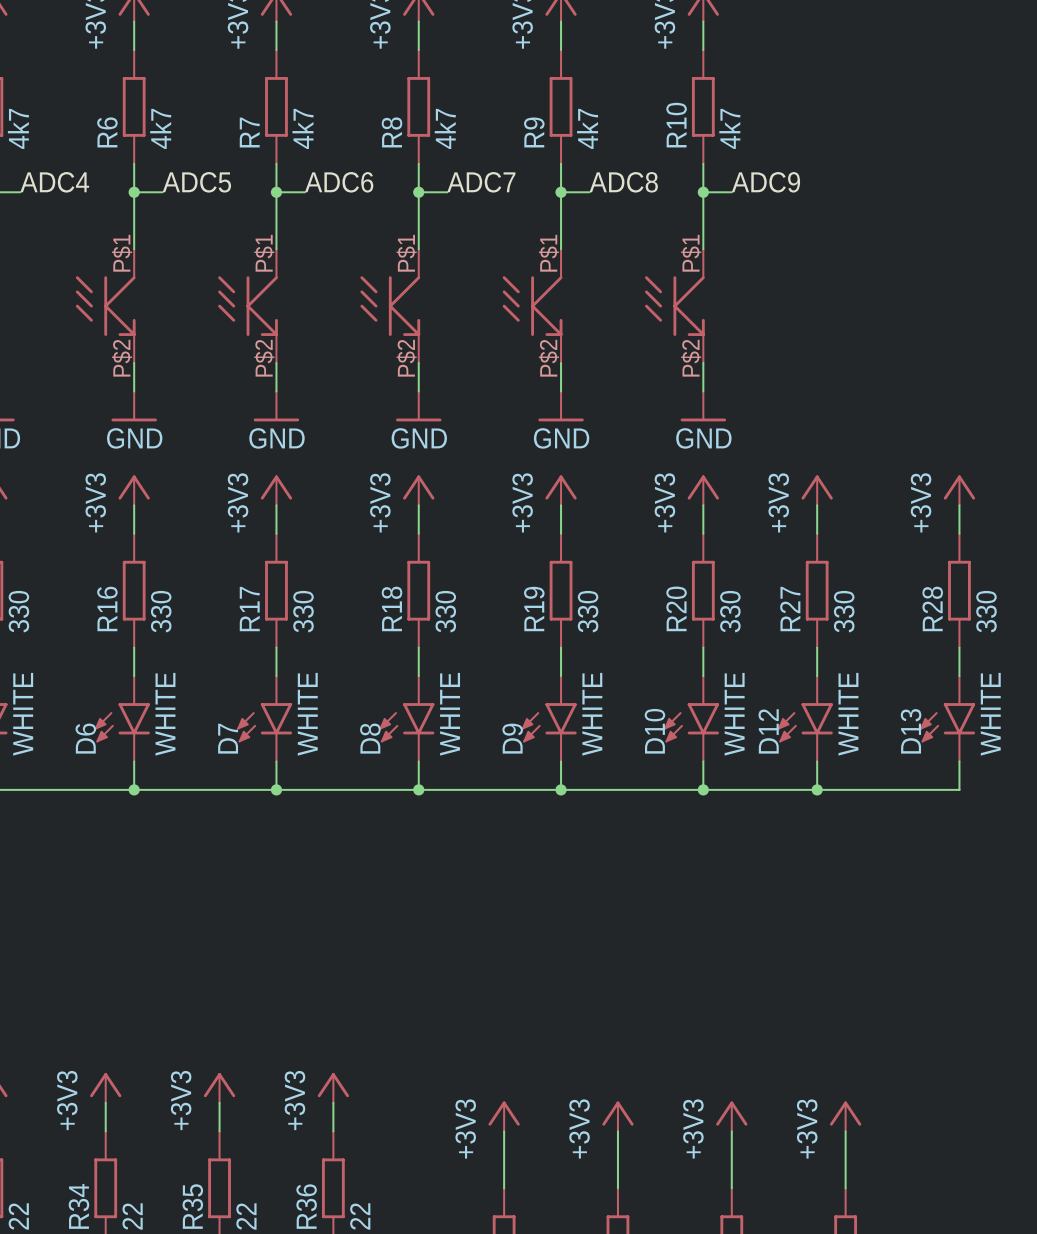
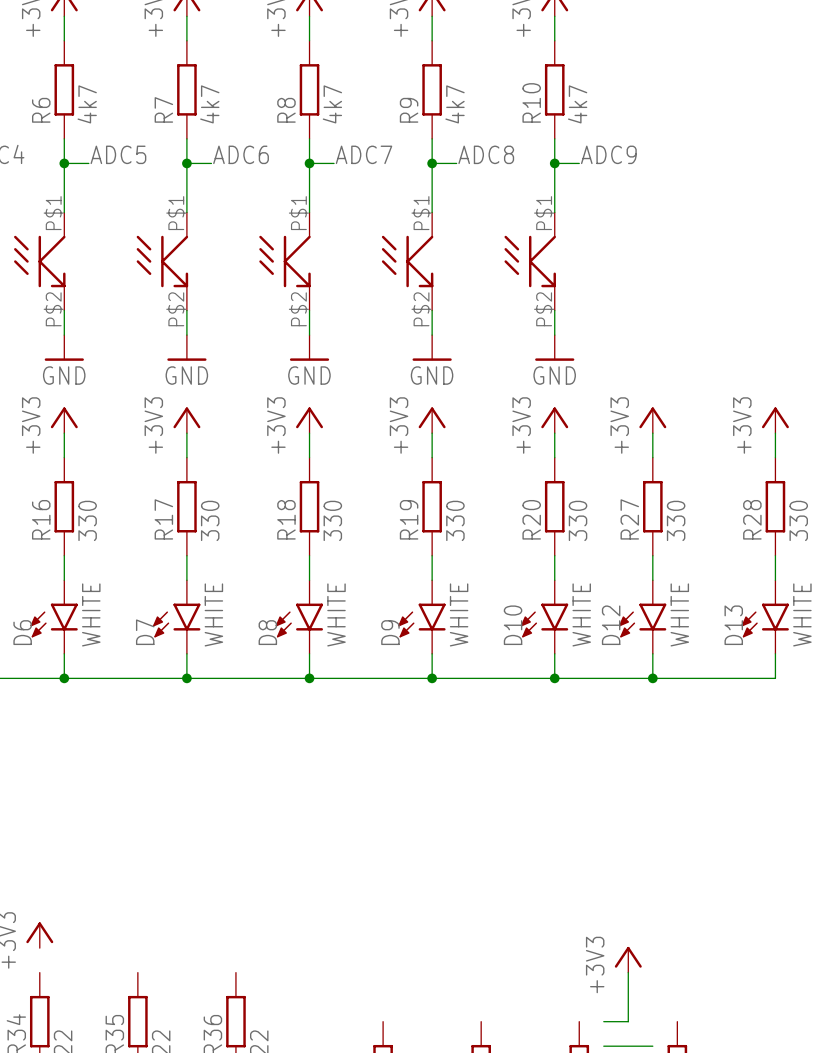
power symbol: +3V3 (219, 1087) -> none
power symbol: +3V3 (333, 1087) -> none
wire: (105, 1102) (105, 1131) -> none
wire: (219, 1102) (219, 1131) -> none
wire: (333, 1102) (333, 1131) -> none
power symbol: +3V3 (504, 1116) -> none
power symbol: +3V3 (617, 1116) -> none
power symbol: +3V3 (731, 1116) -> none
power symbol: none -> +3V3 (628, 959)
power symbol: +3V3 (845, 1116) -> none
wire: (504, 1131) (504, 1188) -> none
wire: (617, 1131) (617, 1188) -> none
wire: (731, 1131) (731, 1188) -> none
wire: none -> (628, 972) (628, 1021) (603, 1021)
wire: (845, 1131) (845, 1188) -> none
wire: none -> (603, 1046) (652, 1046)

